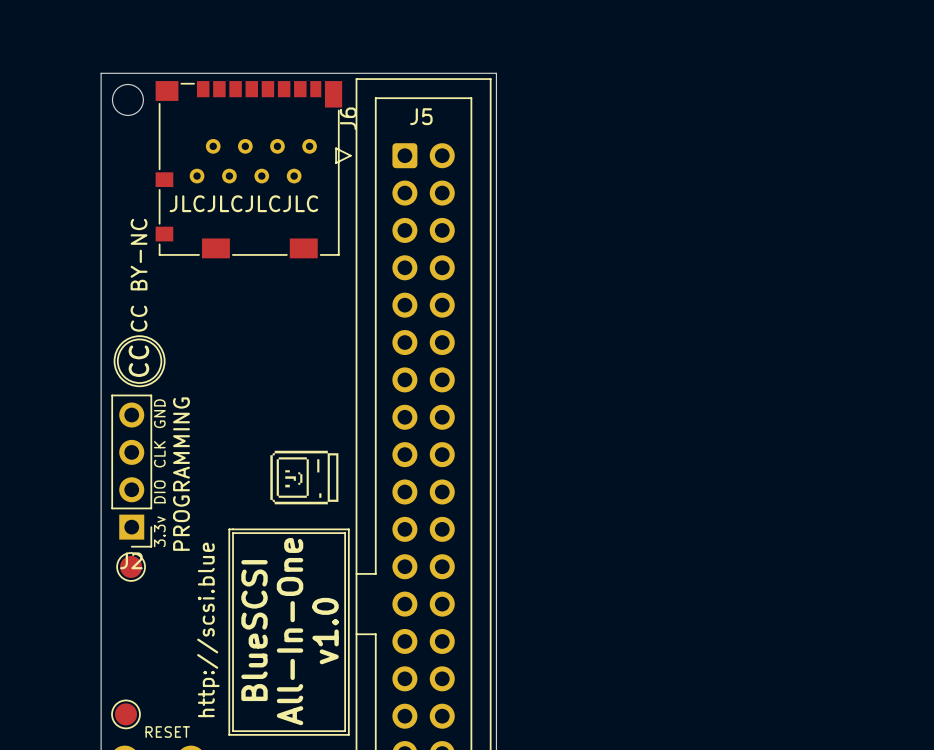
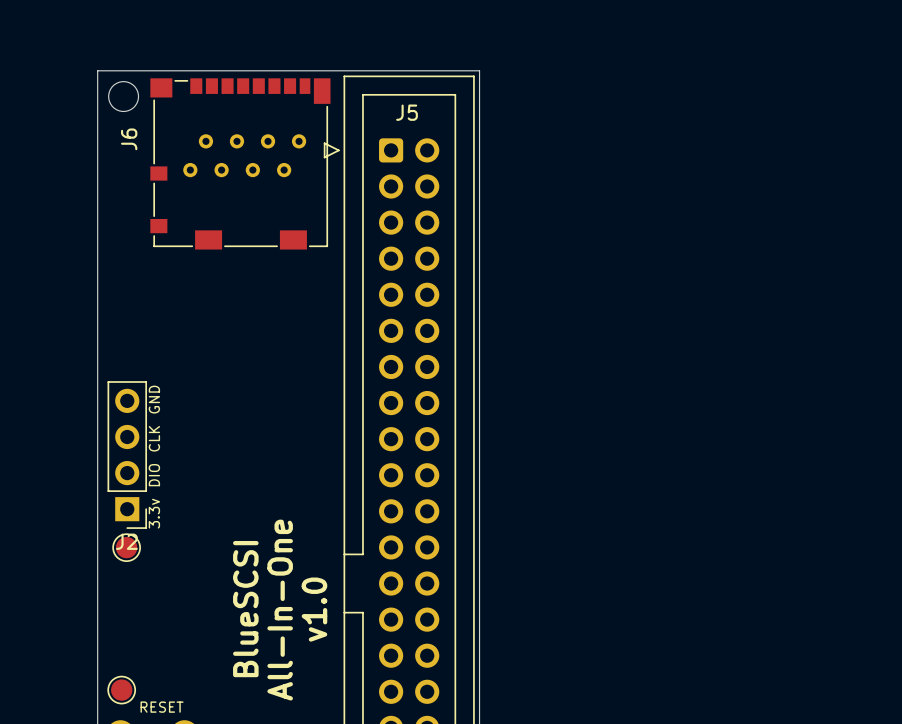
J6 name position: J6 (348, 118) -> J6 (129, 139)
text: JLCJLCJLCJLC (243, 203) -> none
text: CC BY-NC (139, 275) -> none
drawing: [113, 335, 166, 388] -> none
text: CC (138, 361) -> none
drawing: [270, 450, 339, 505] -> none
text: PROGRAMMING (181, 474) -> none
line: (229, 529) (348, 529) (348, 734) (229, 734) (229, 529) -> none
line: (233, 533) (233, 731) (345, 731) (345, 533) (233, 533) -> none
text: http://scsi.blue (208, 629) -> none

